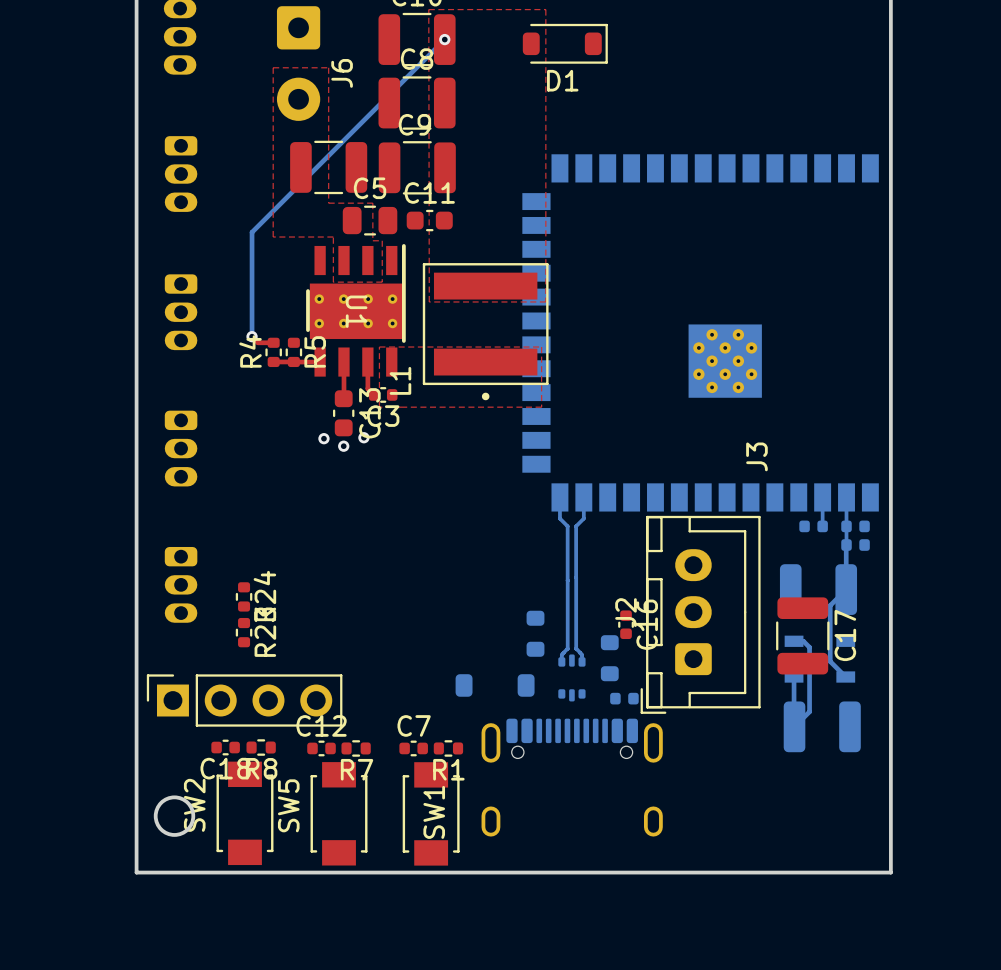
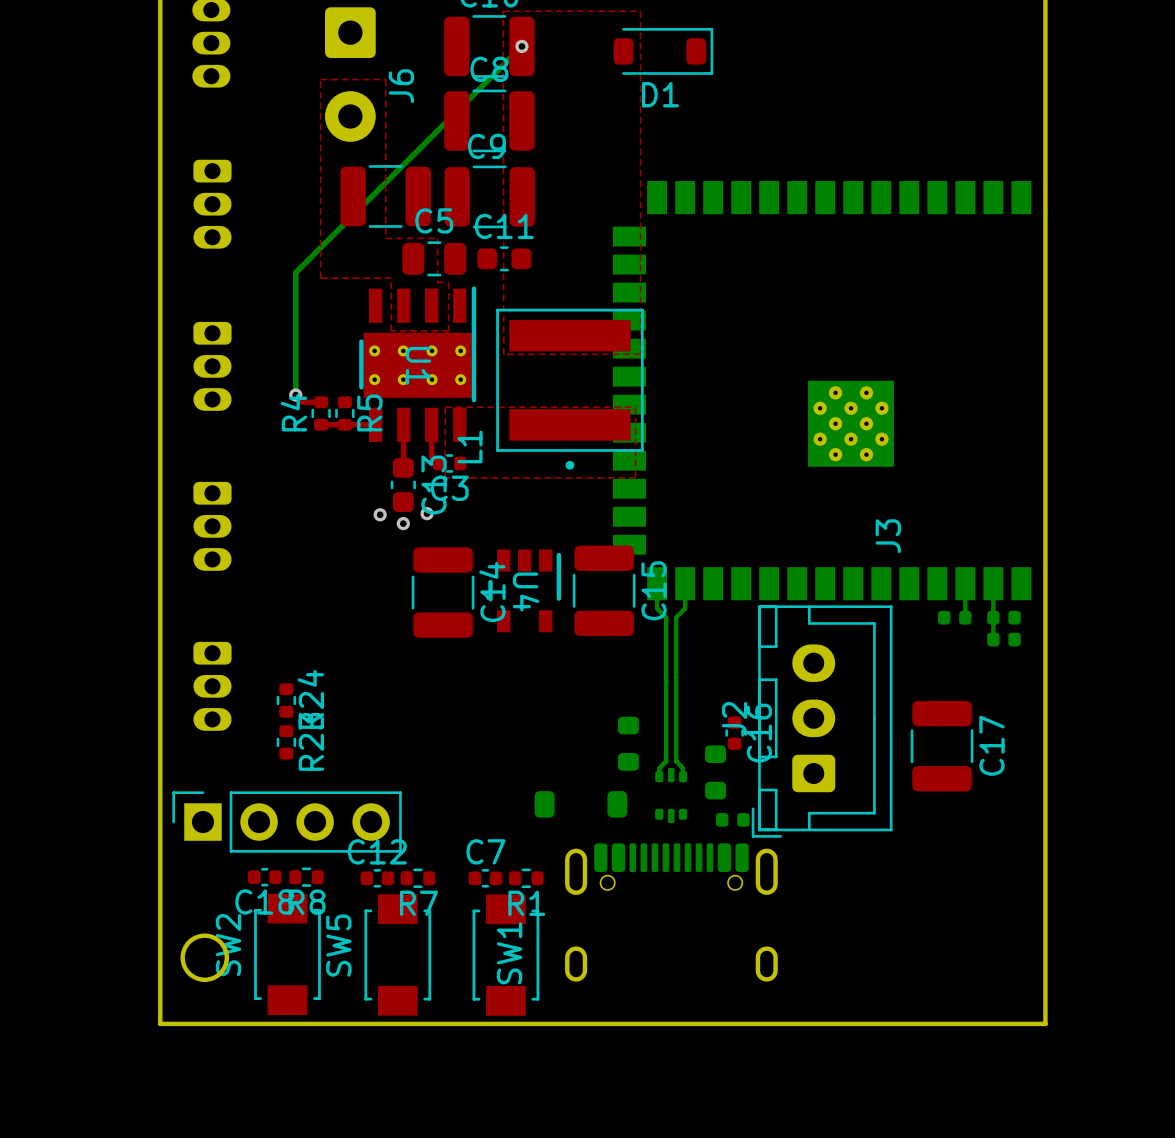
bottom track: (846, 545) (846, 589) (830, 605) (830, 661) (845, 677) -> none
C14 side: bottom (818, 589) -> top (443, 592)
bottom track: (794, 641) (803, 641) (809, 647) (809, 711) (794, 726) (794, 677) -> none
U4 side: bottom (819, 659) -> top (524, 590)
C15 side: bottom (822, 726) -> top (604, 590)

